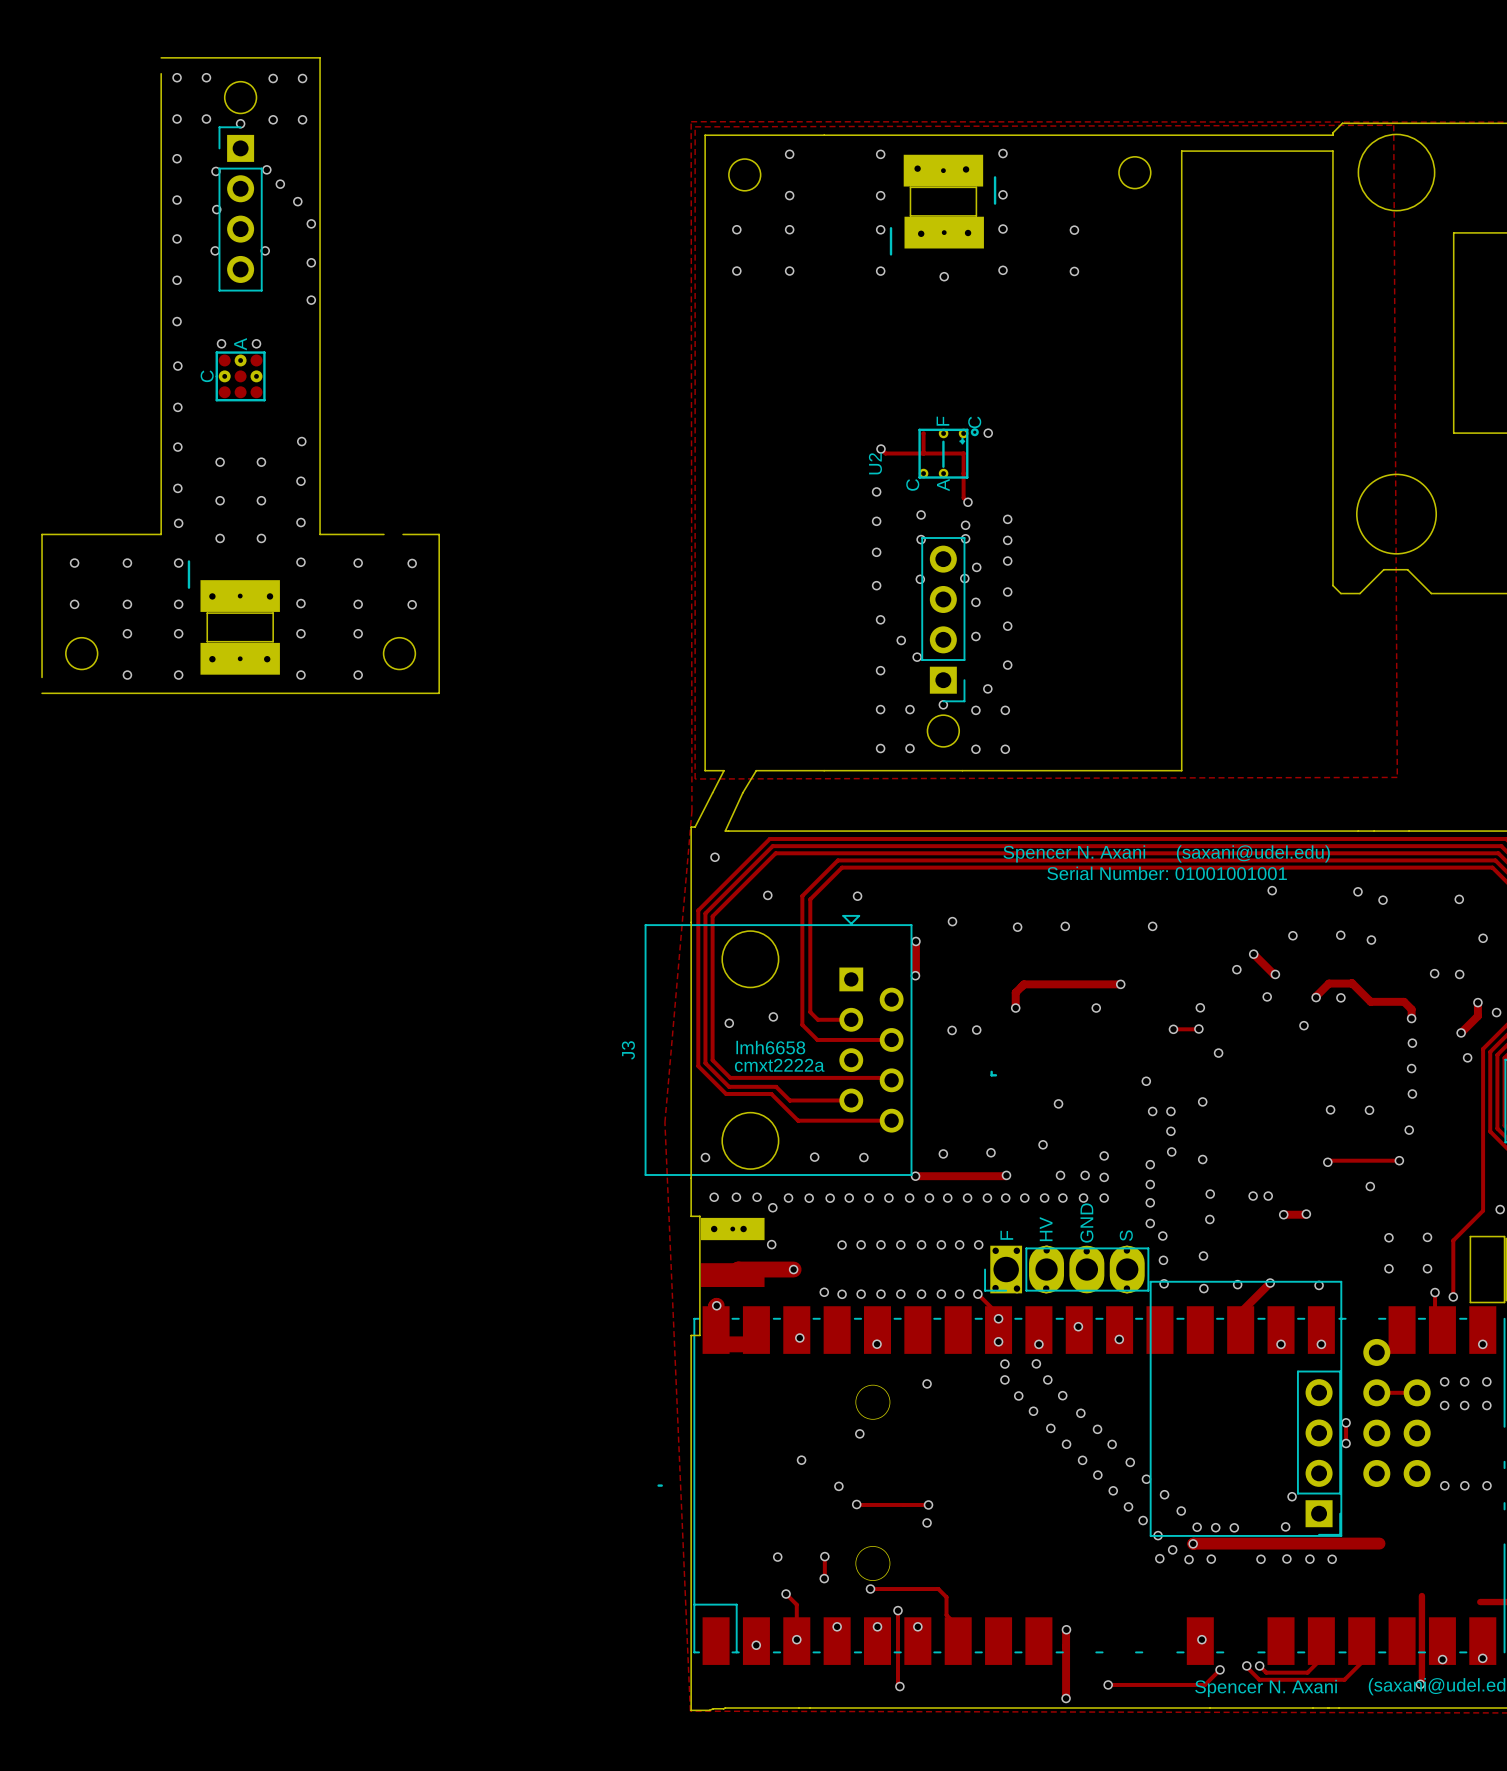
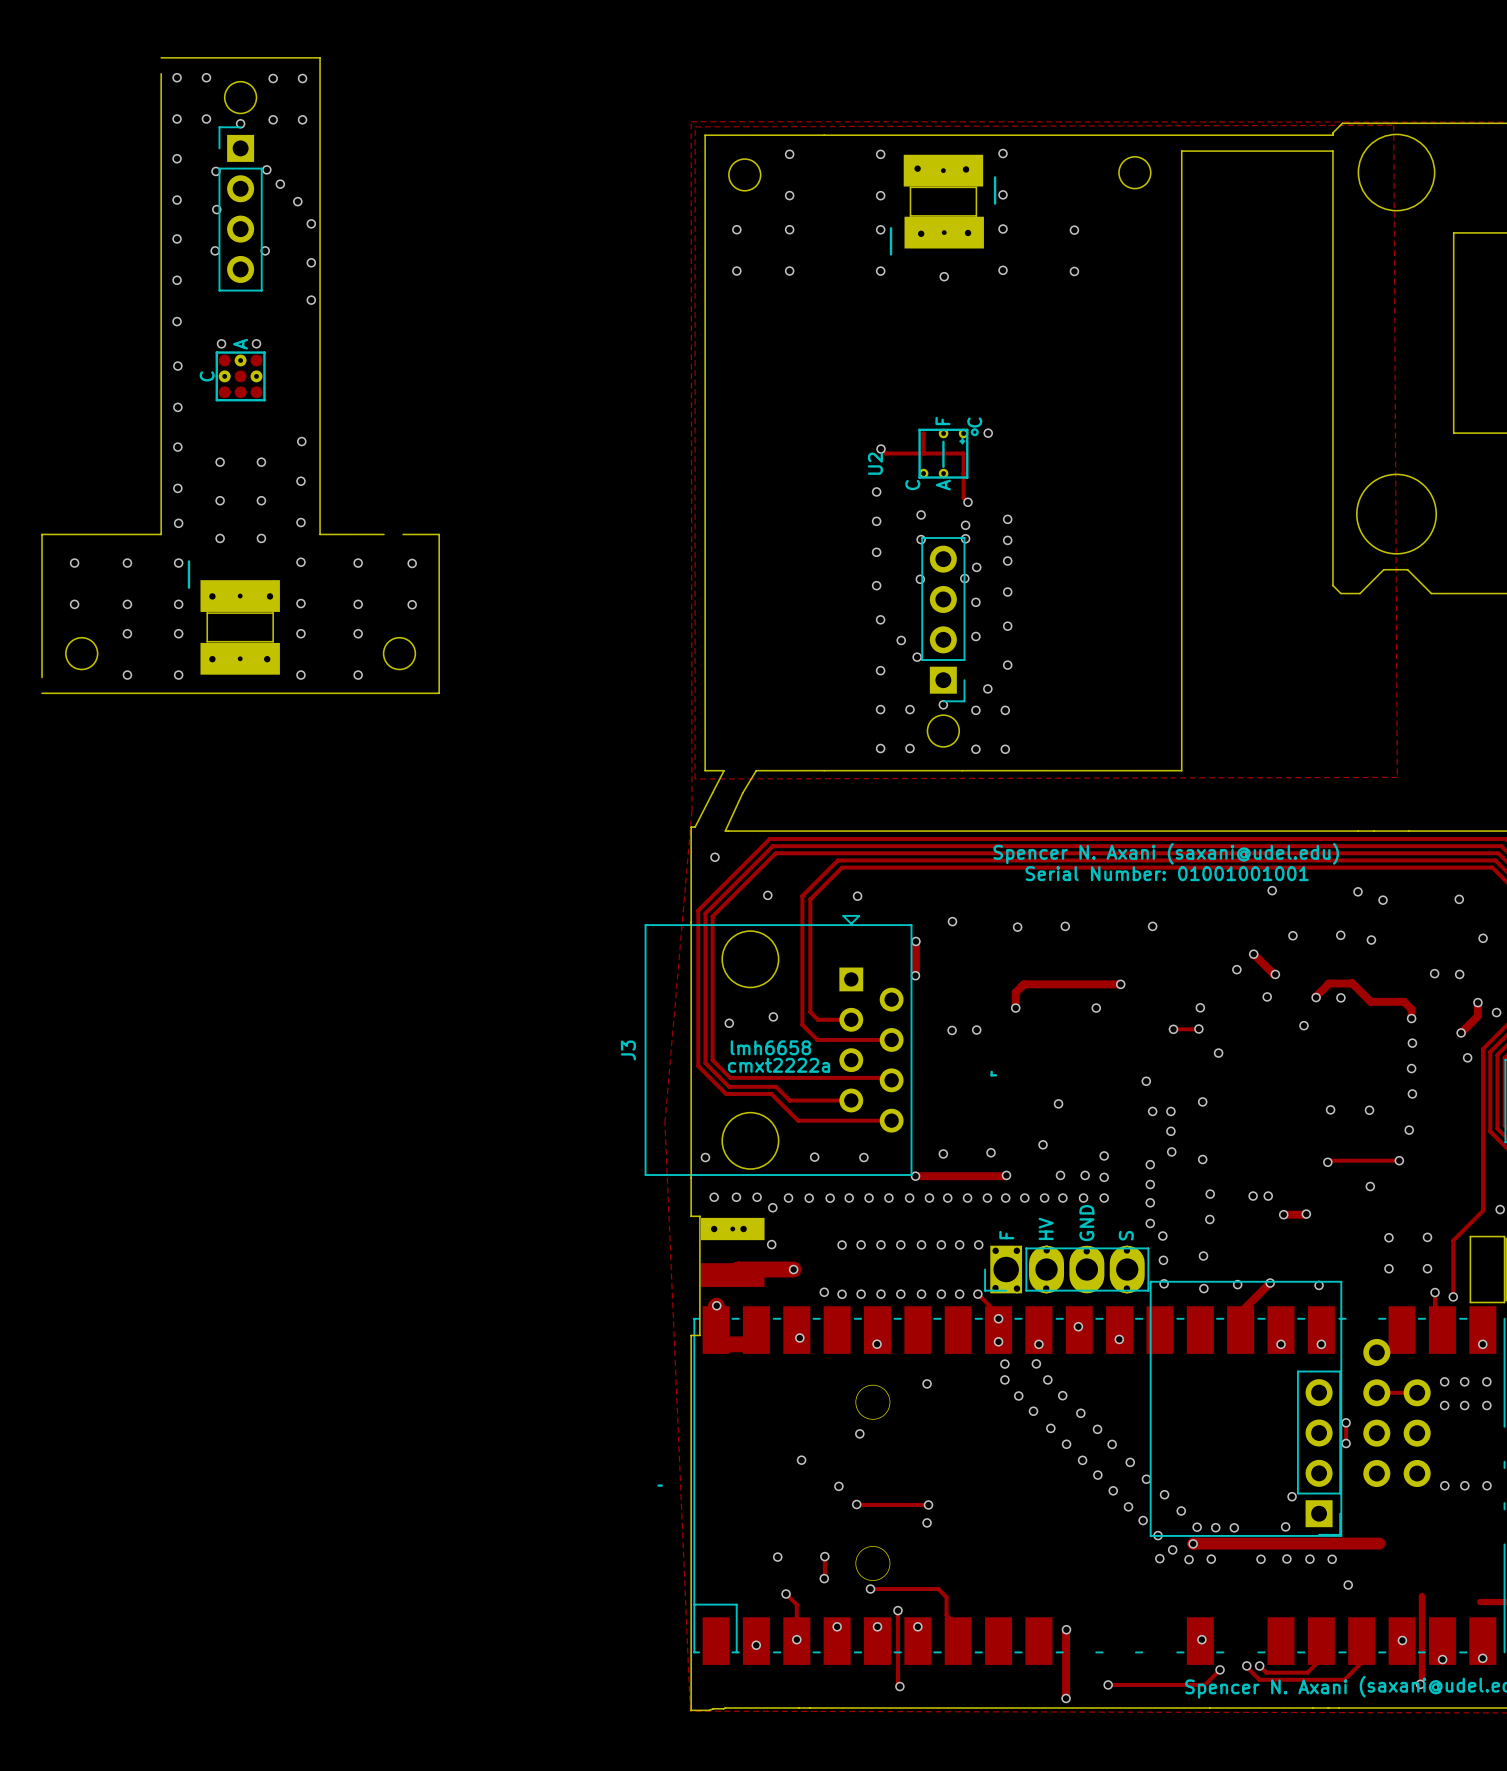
via: none -> (1348, 1585)
via: none -> (1402, 1640)

